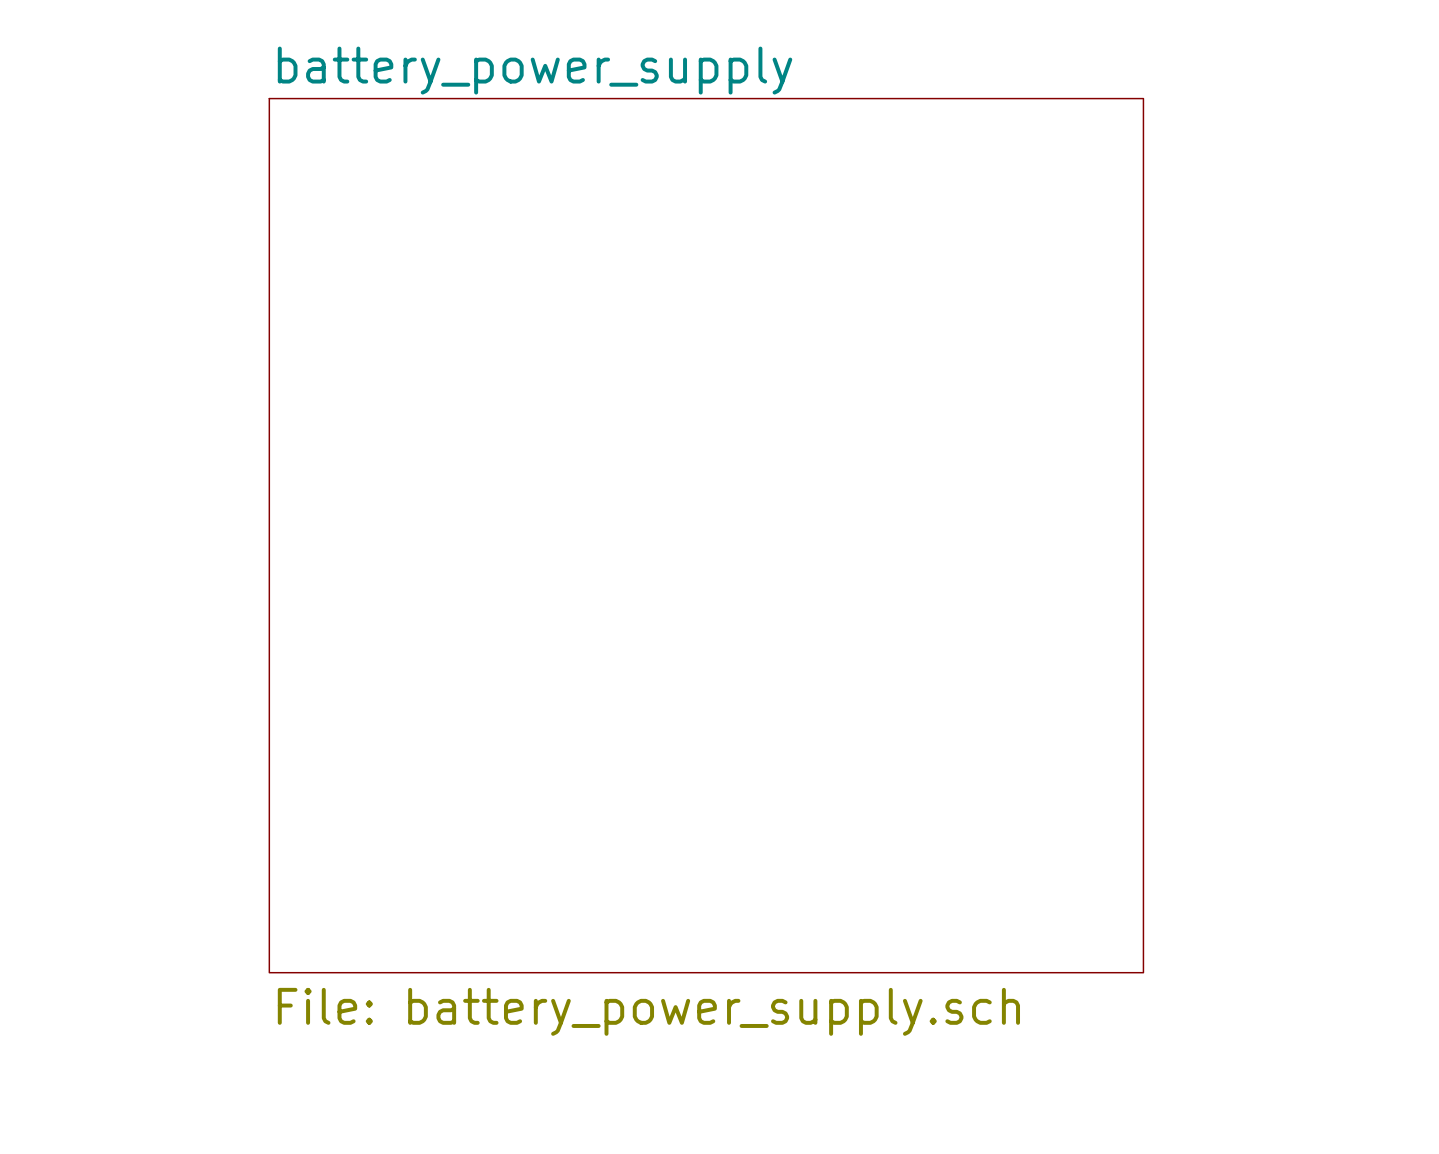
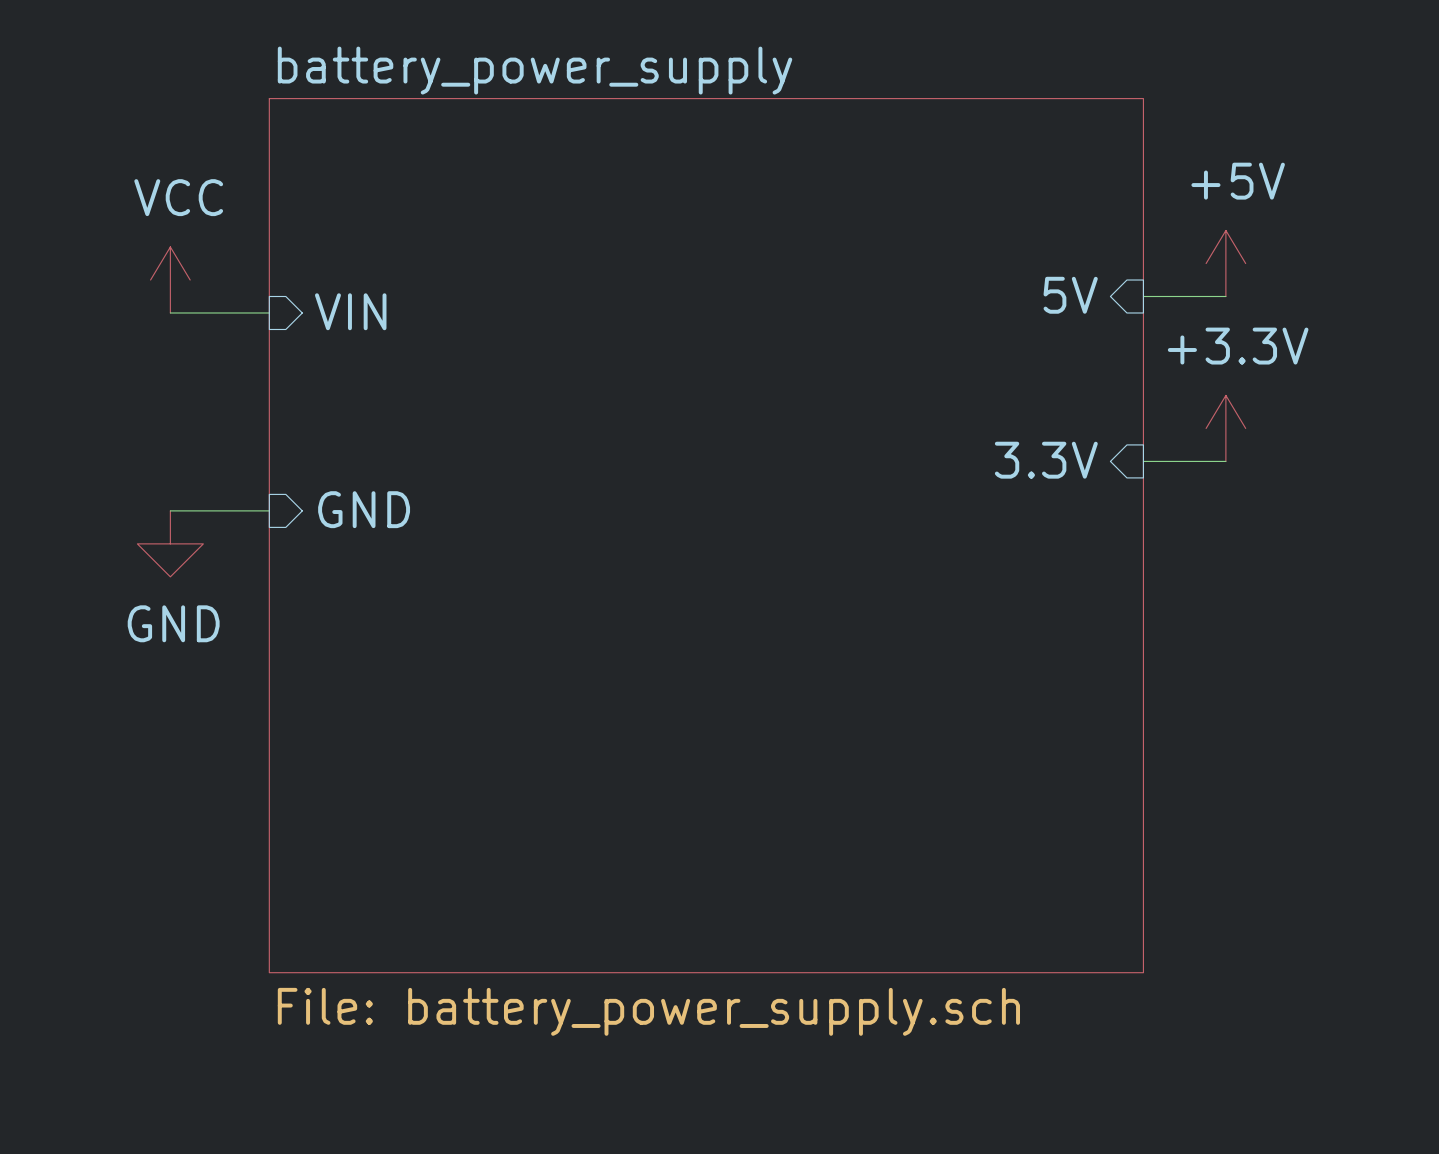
power symbol: none -> +5V (1225, 263)
power symbol: none -> VCC (170, 280)
sheet pin: none -> 5V (1070, 295)
wire: none -> (1143, 296) (1225, 296)
sheet pin: none -> VIN (350, 311)
wire: none -> (170, 312) (269, 312)
power symbol: none -> +3.3V (1225, 428)
sheet pin: none -> 3.3V (1046, 460)
wire: none -> (1143, 461) (1225, 461)
sheet pin: none -> GND (364, 509)
wire: none -> (170, 510) (269, 510)
power symbol: none -> GND (170, 543)

